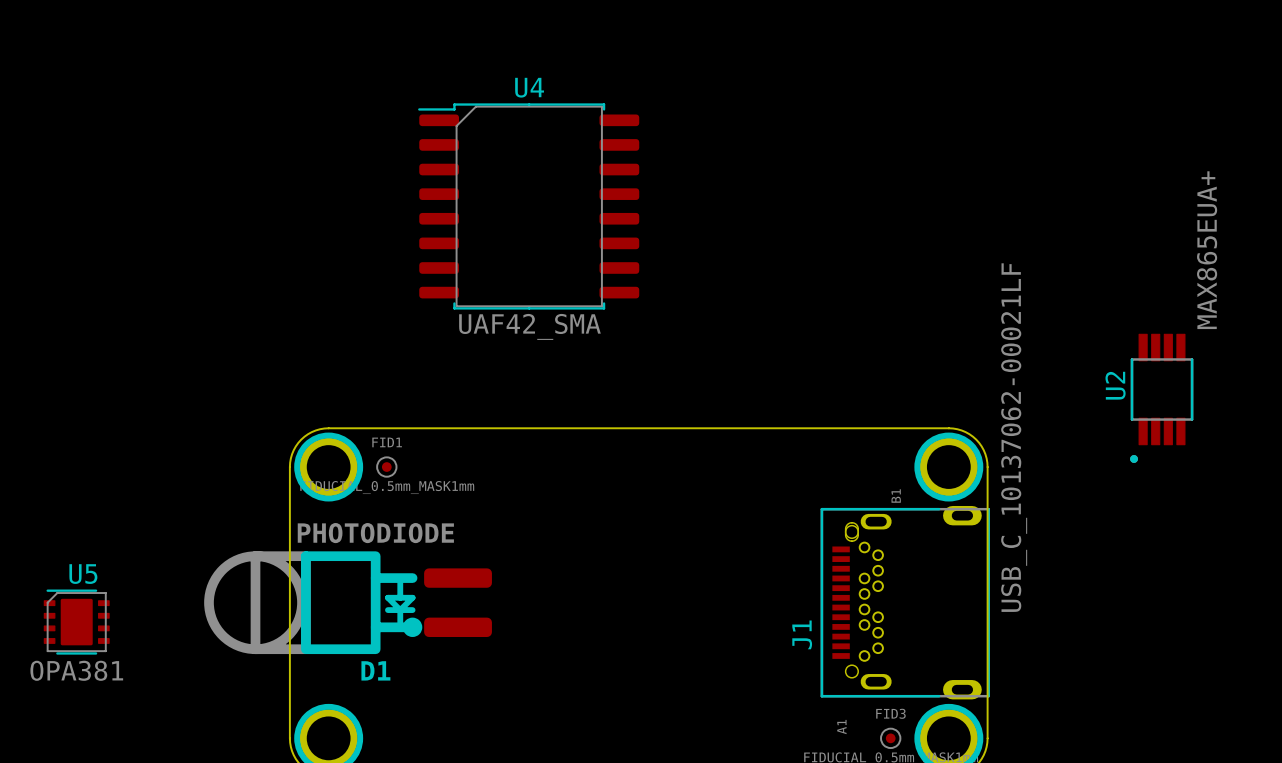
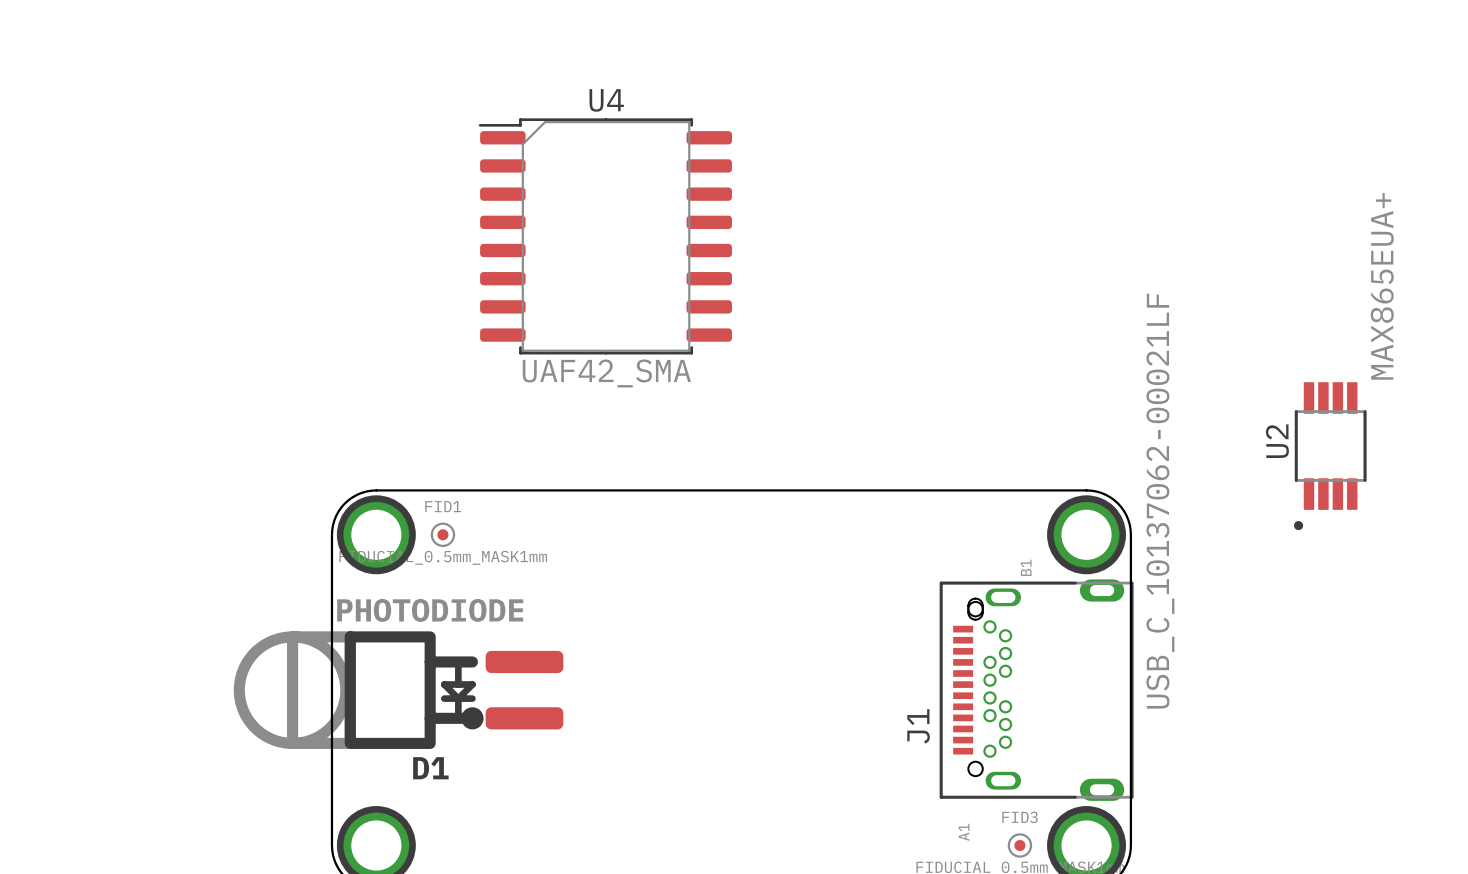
U5: OPA381 (76, 622) -> none

